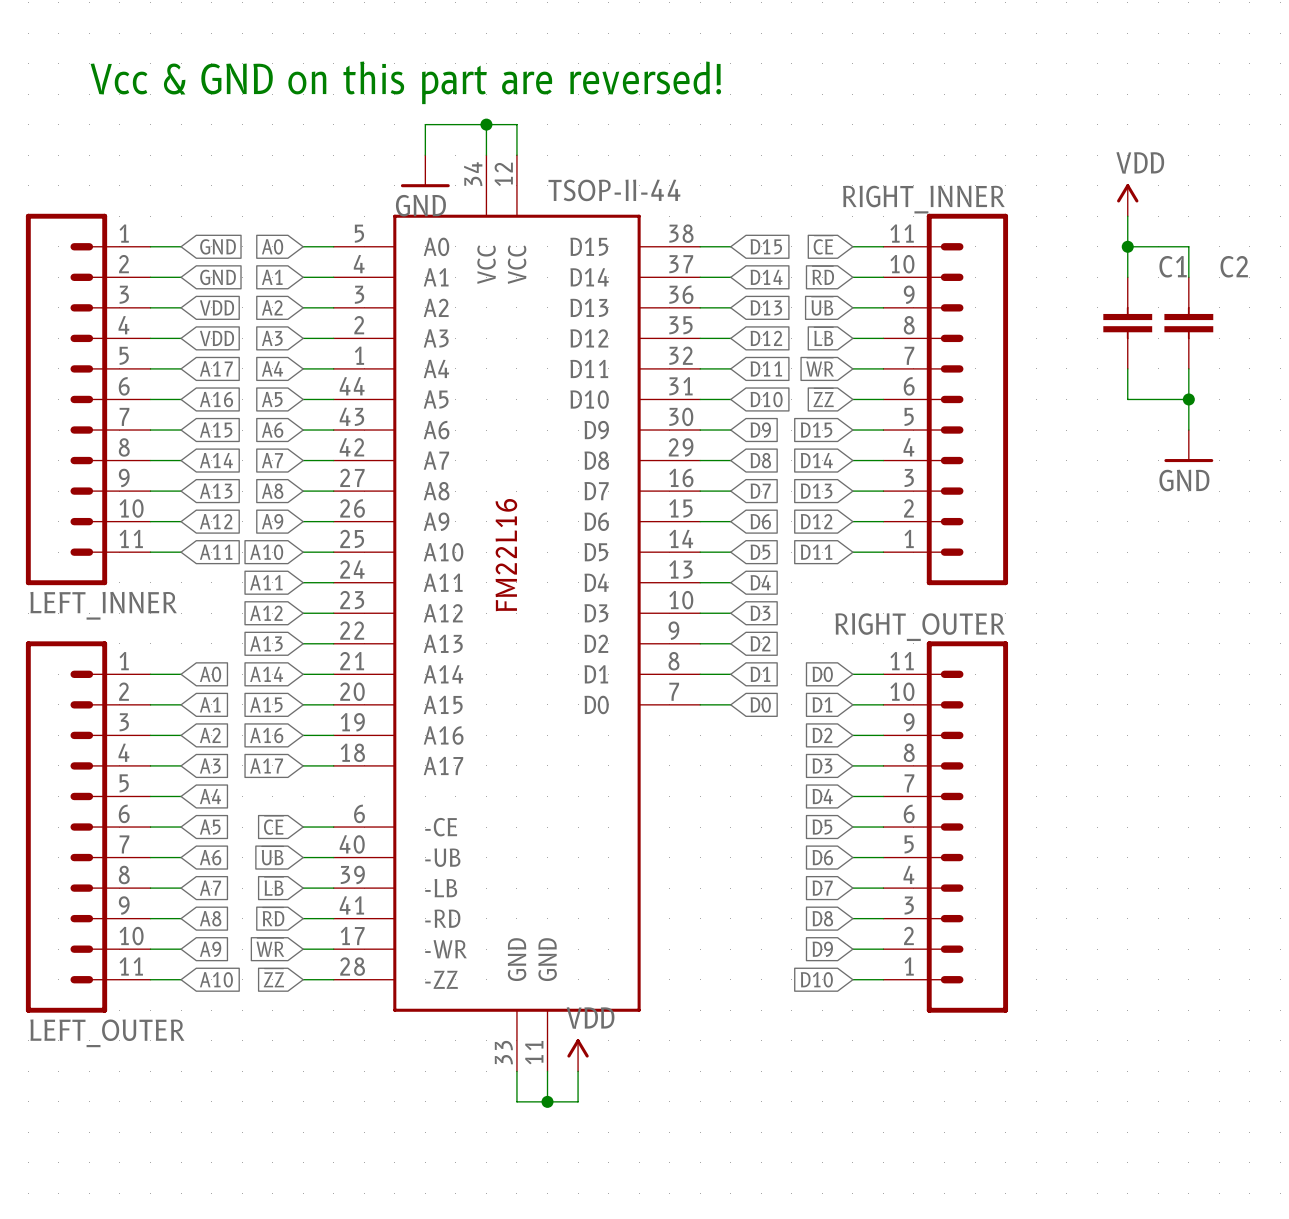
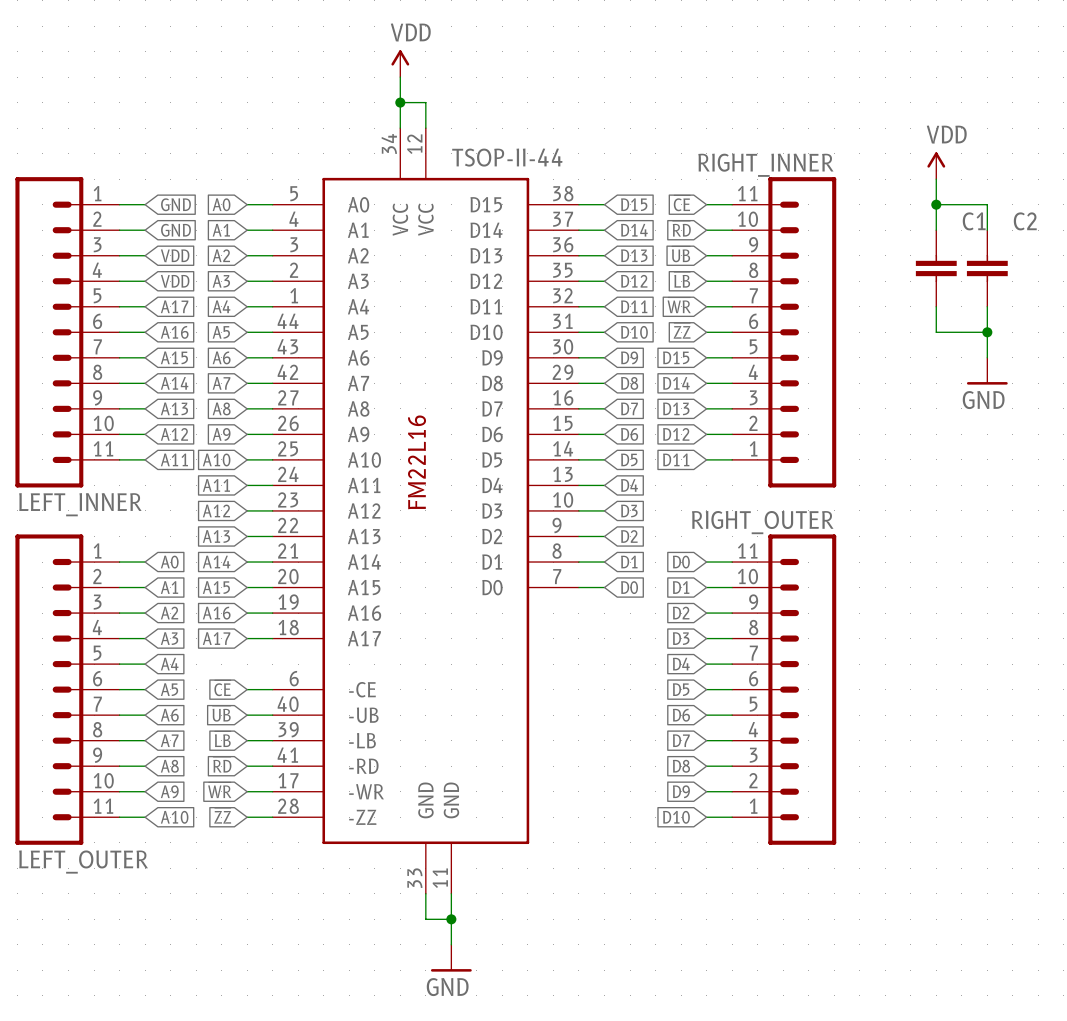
power symbol: none -> VDD (400, 63)
text: Vcc & GND on this part are reversed! (405, 82) -> none
wire: (486, 124) (425, 124) (425, 155) -> (400, 102) (400, 77)
power symbol: GND (425, 171) -> none
power symbol: VDD (578, 1055) -> none
wire: (578, 1071) (578, 1101) (547, 1101) -> (451, 944) (451, 919)
power symbol: none -> GND (451, 958)

